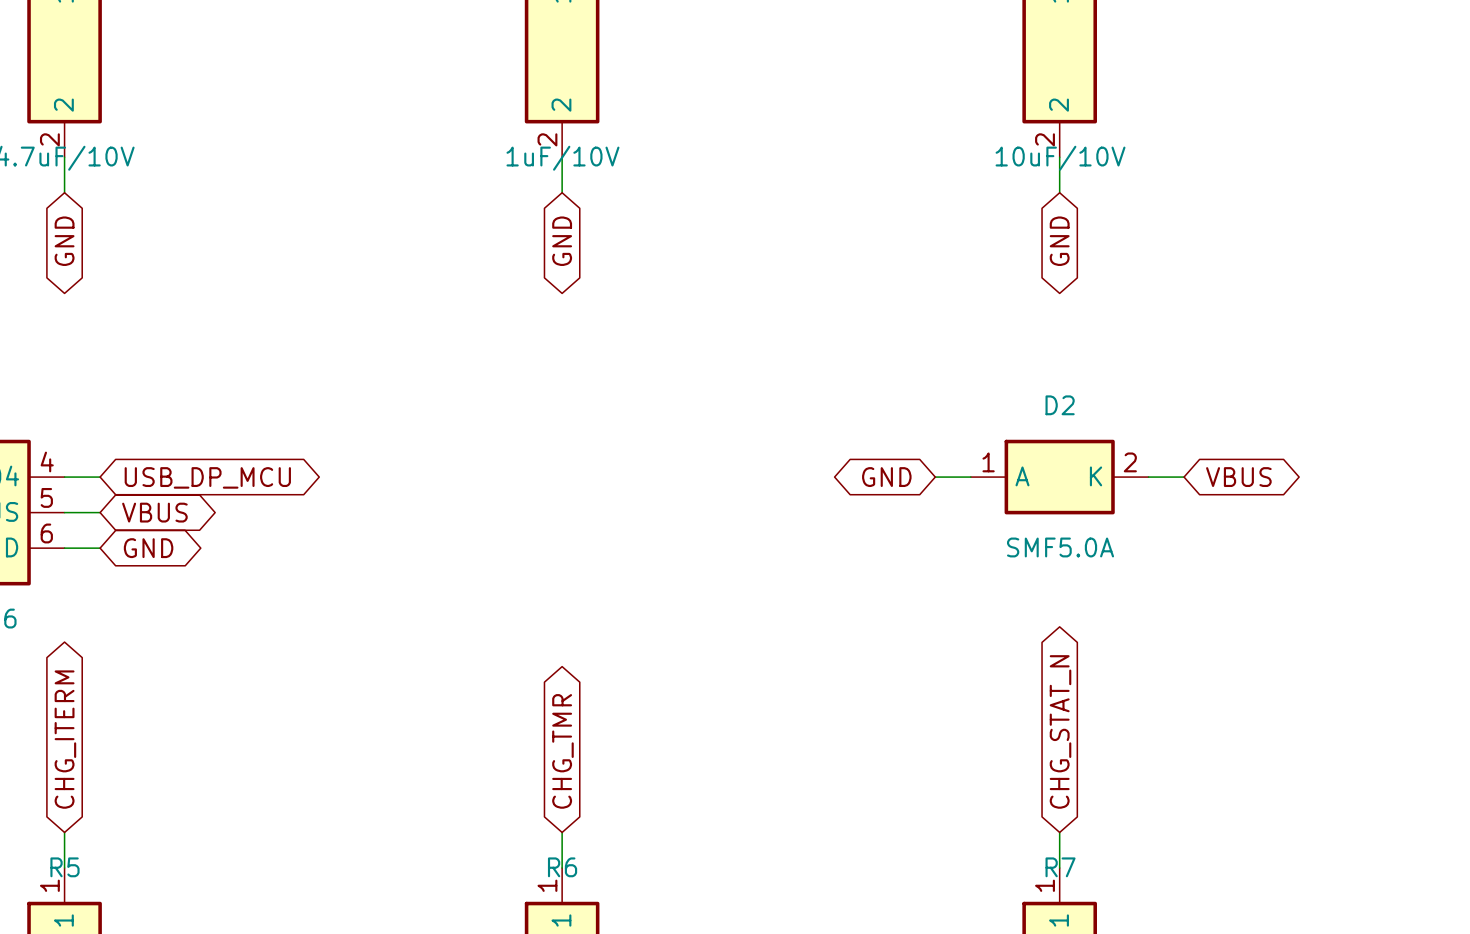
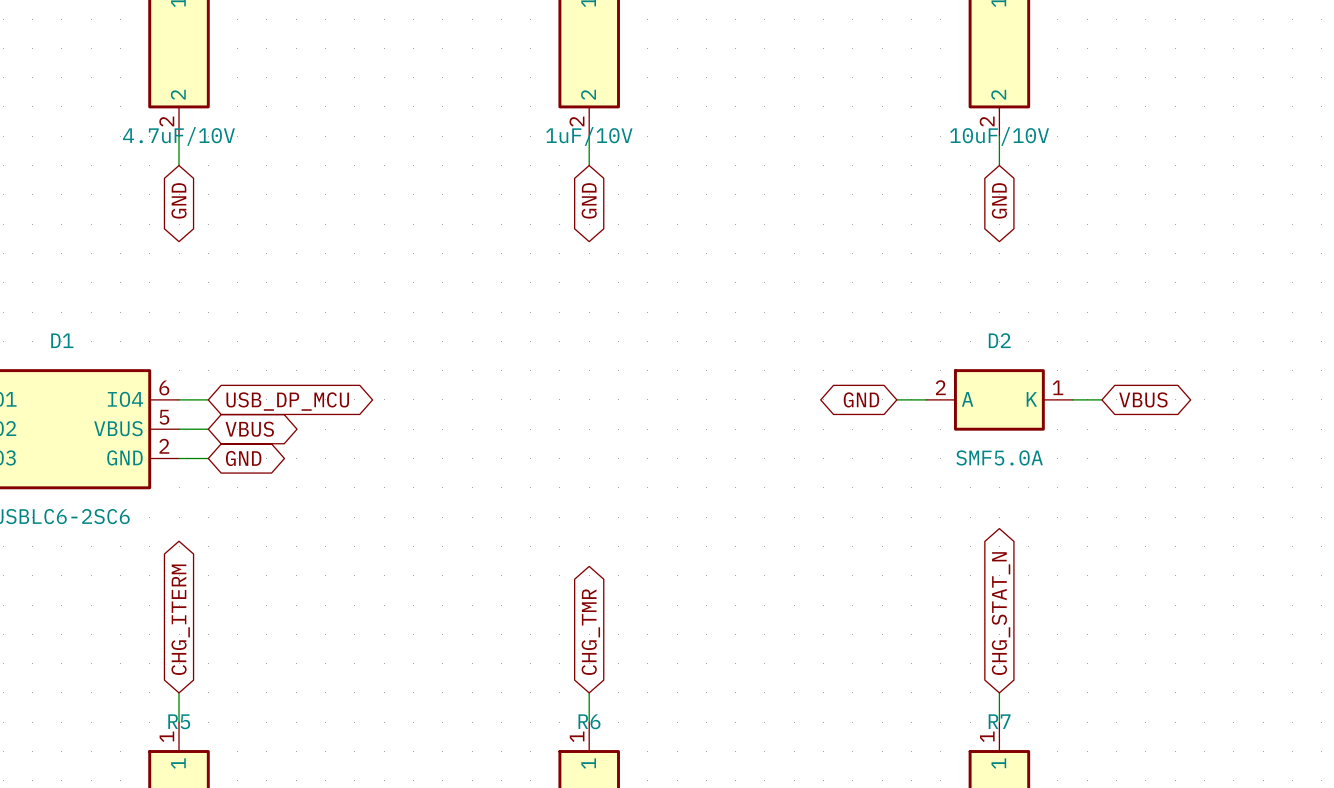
D1 pin number: 4 (47, 461) -> 6 (164, 387)
D2 pin number: 1 (988, 462) -> 2 (940, 387)
D2 pin number: 2 (1130, 462) -> 1 (1058, 387)
D1 pin number: 6 (46, 533) -> 2 (164, 446)

